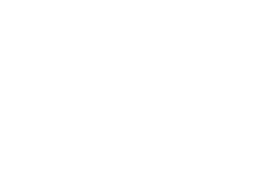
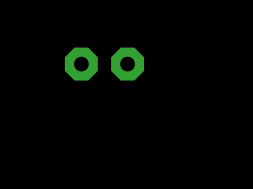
part: none -> (104, 64)

